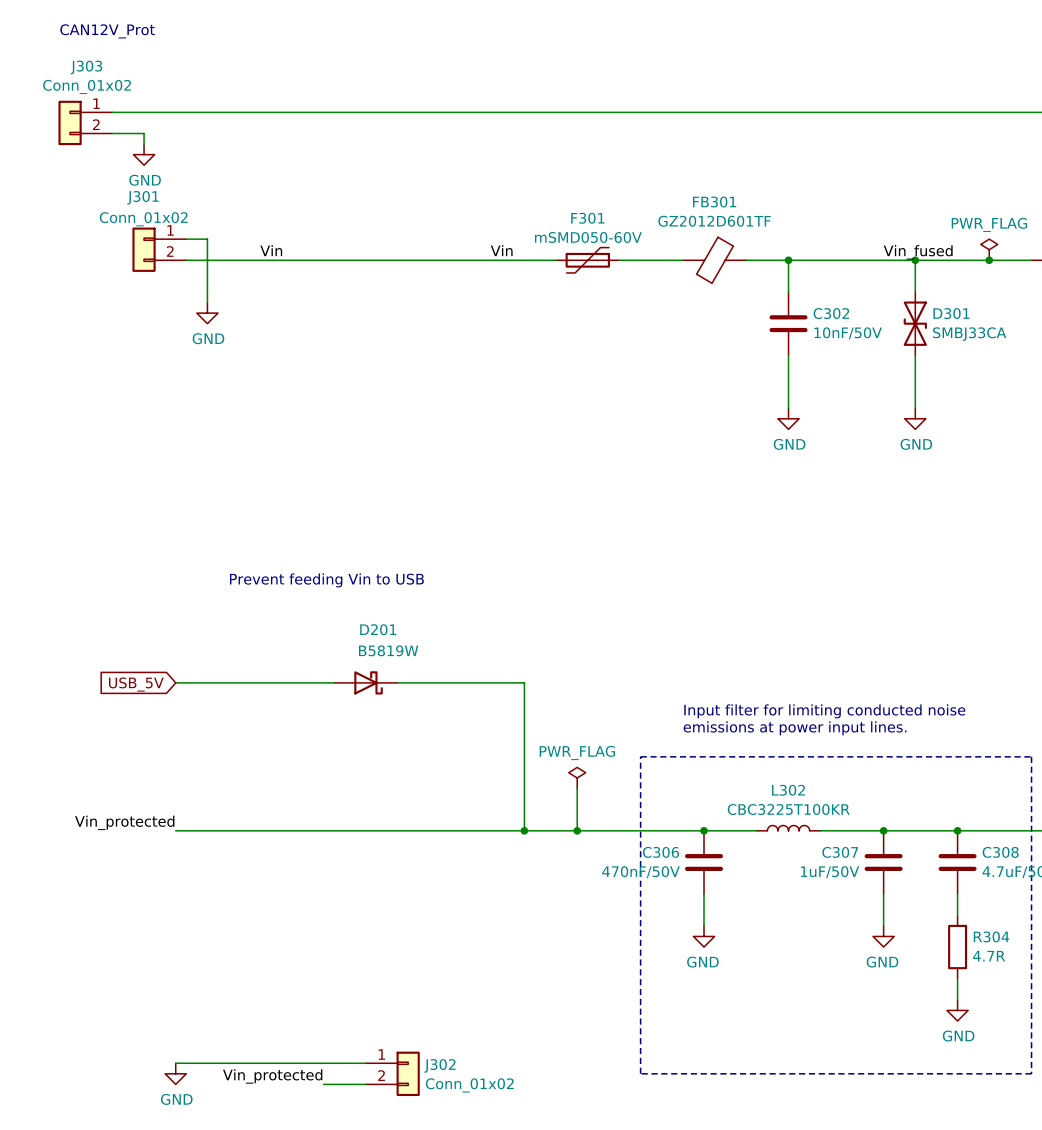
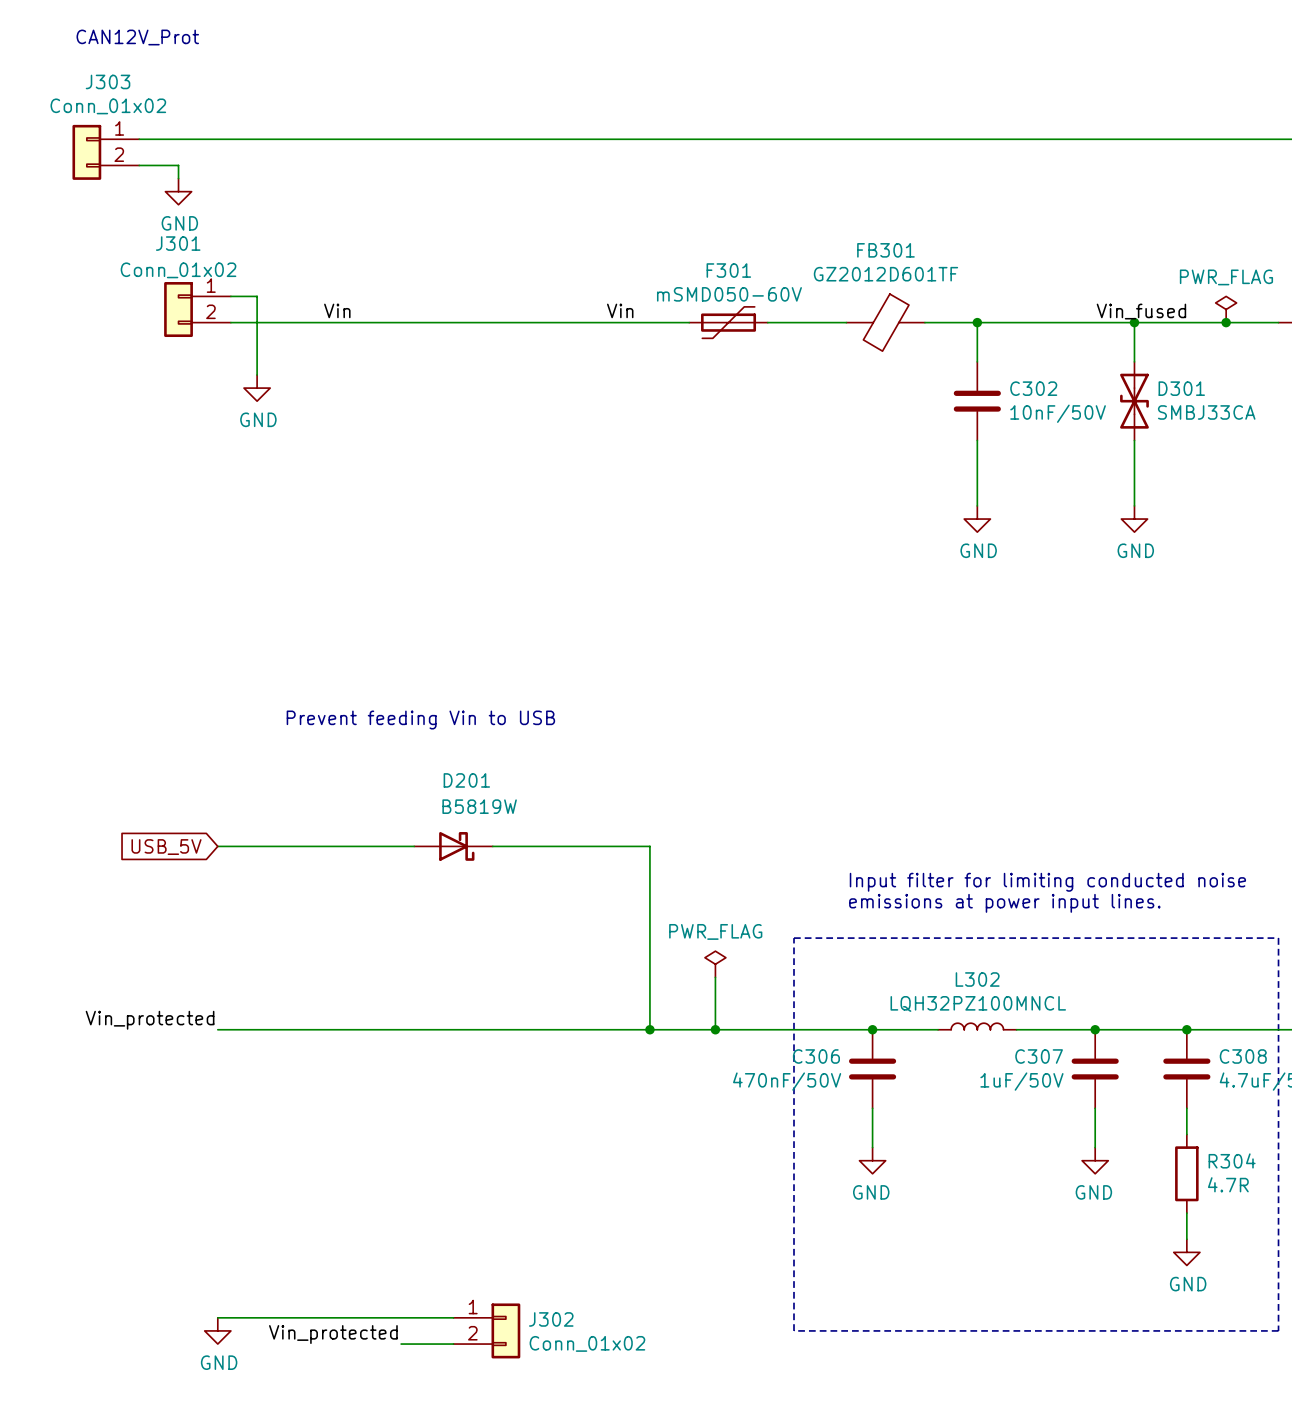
L302 value: CBC3225T100KR (788, 809) -> LQH32PZ100MNCL (978, 1003)

